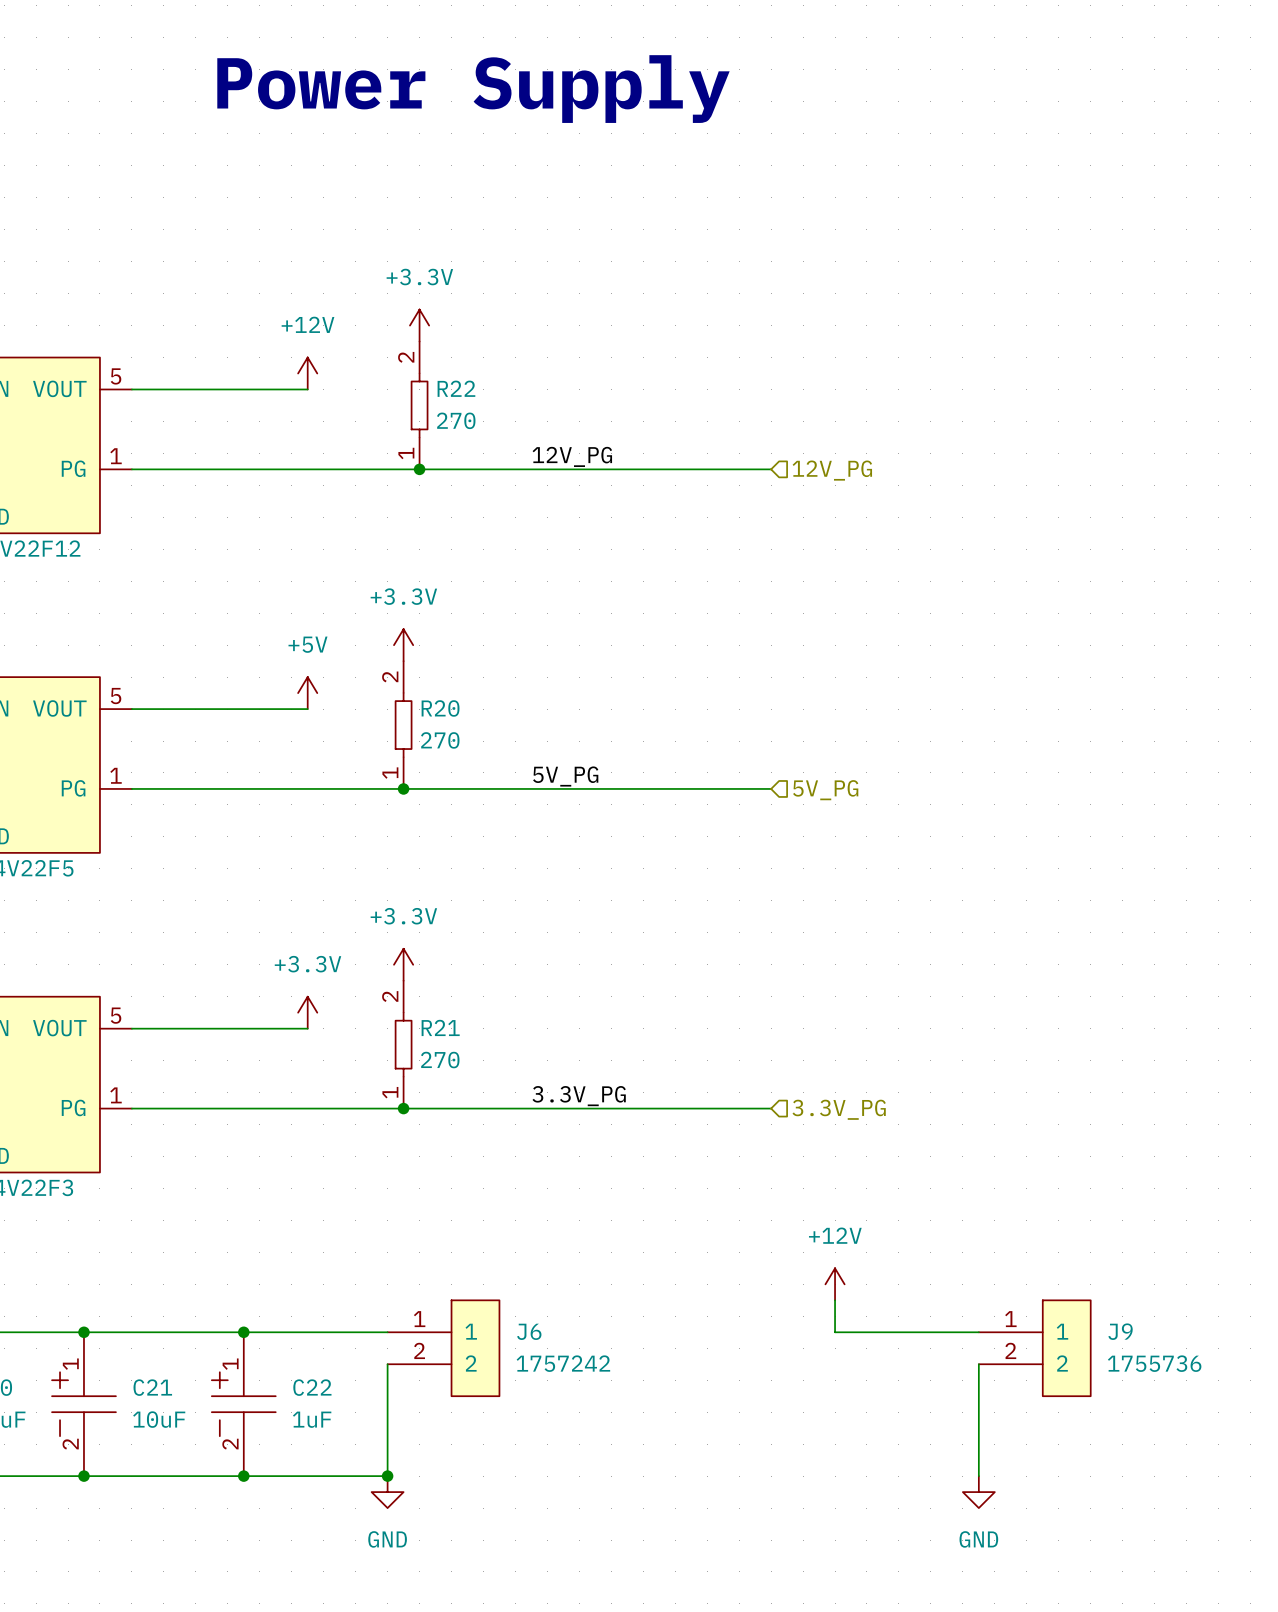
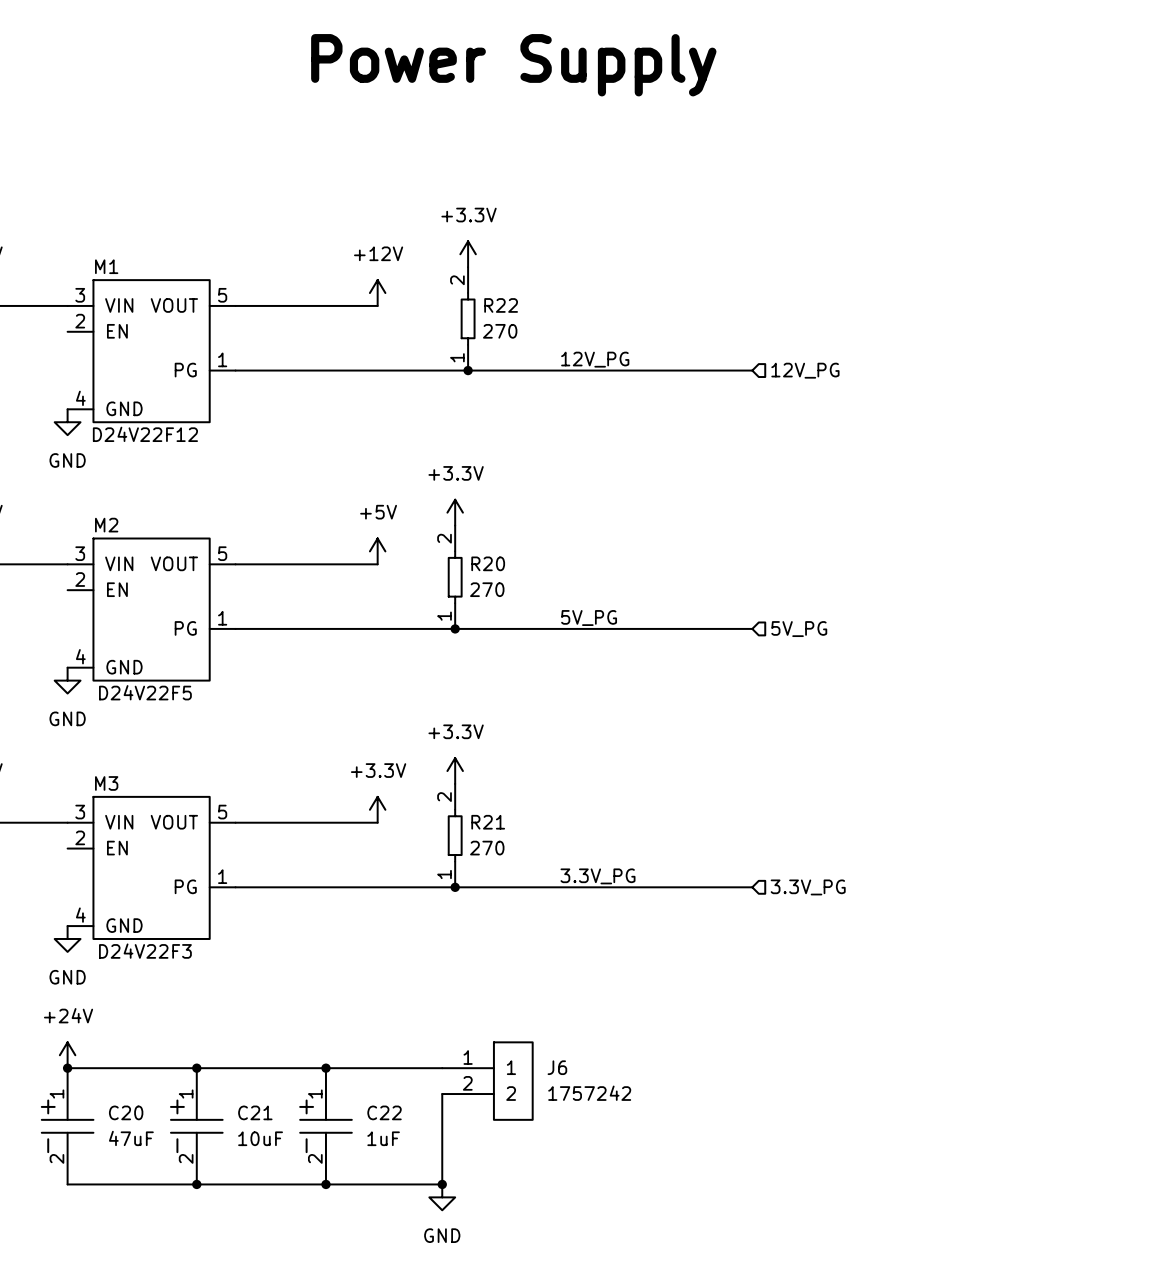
power symbol: +12V (835, 1284) -> none
wire: (835, 1300) (835, 1332) (978, 1332) -> none
J9: 1755736 (1034, 1348) -> none
wire: (978, 1364) (978, 1476) -> none
power symbol: GND (978, 1492) -> none

